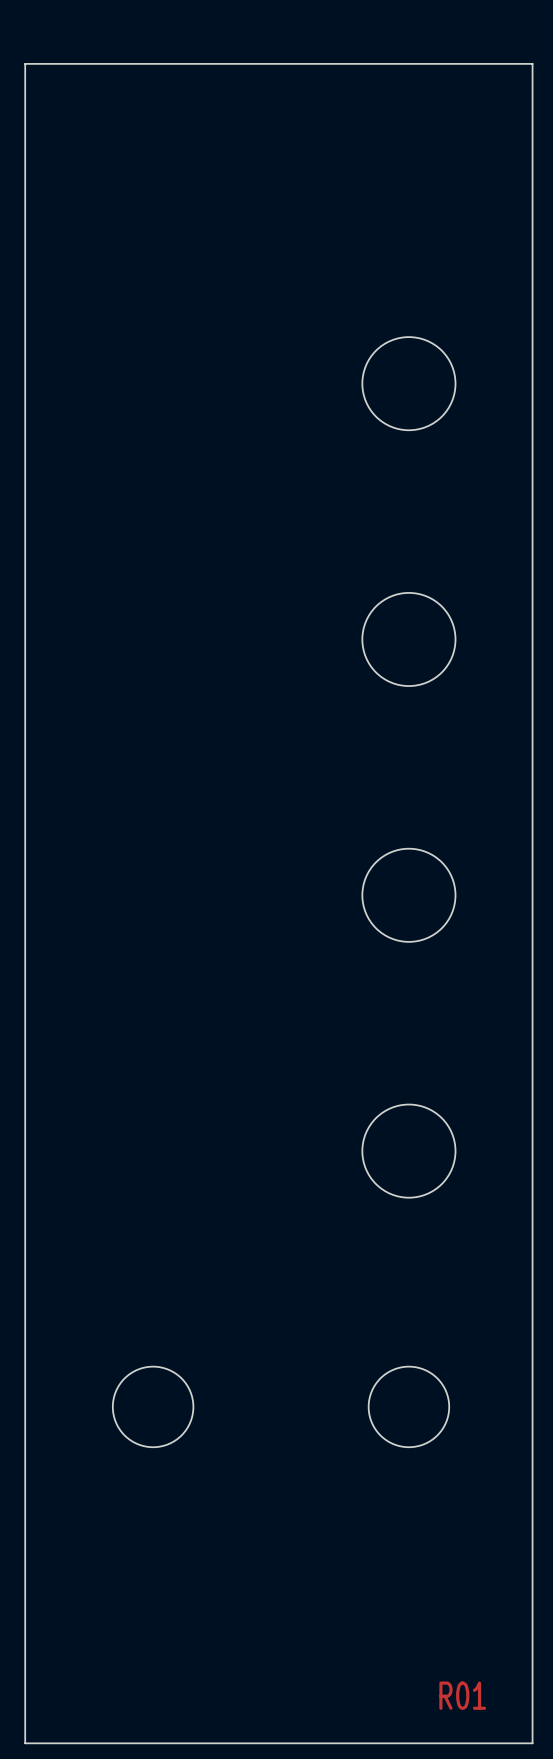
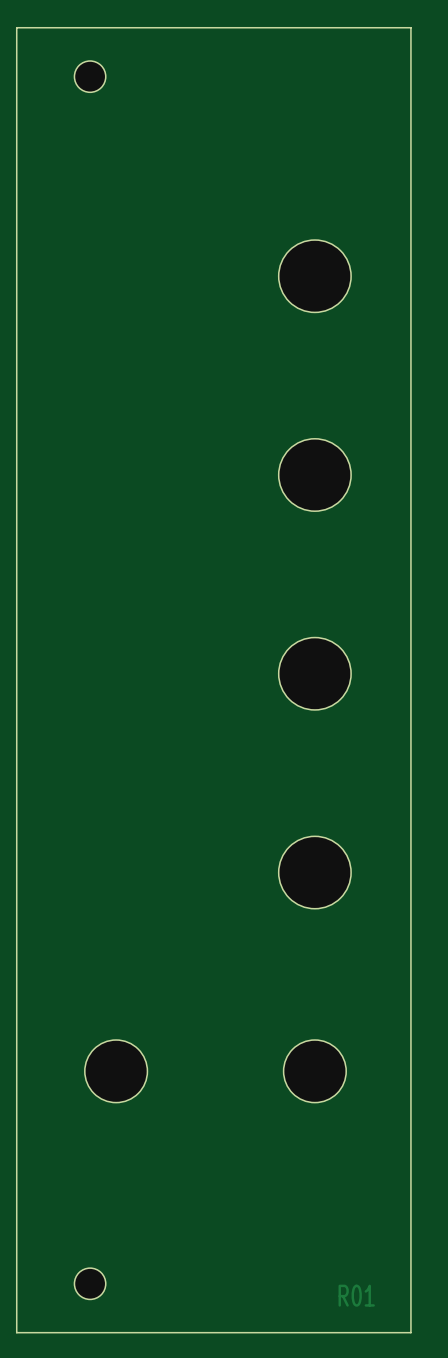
part: none -> (90, 76)
part: none -> (90, 1283)

